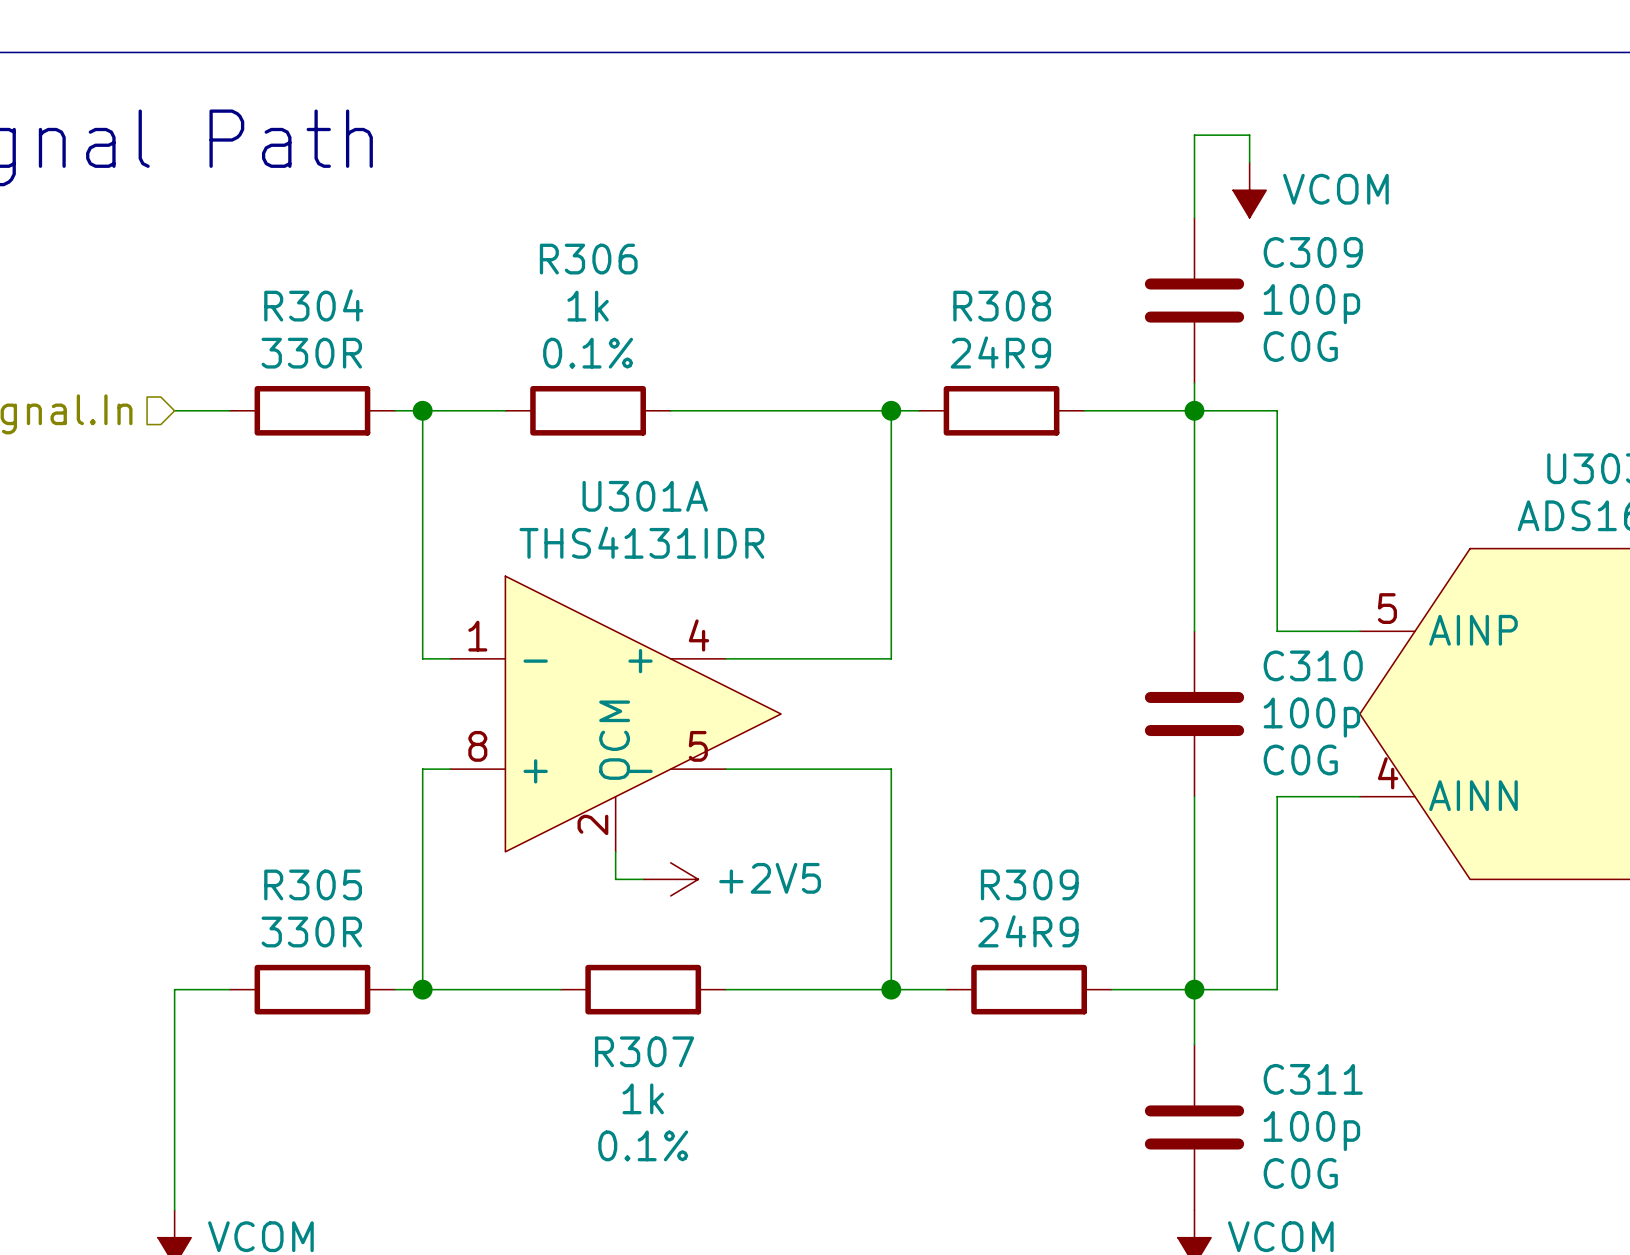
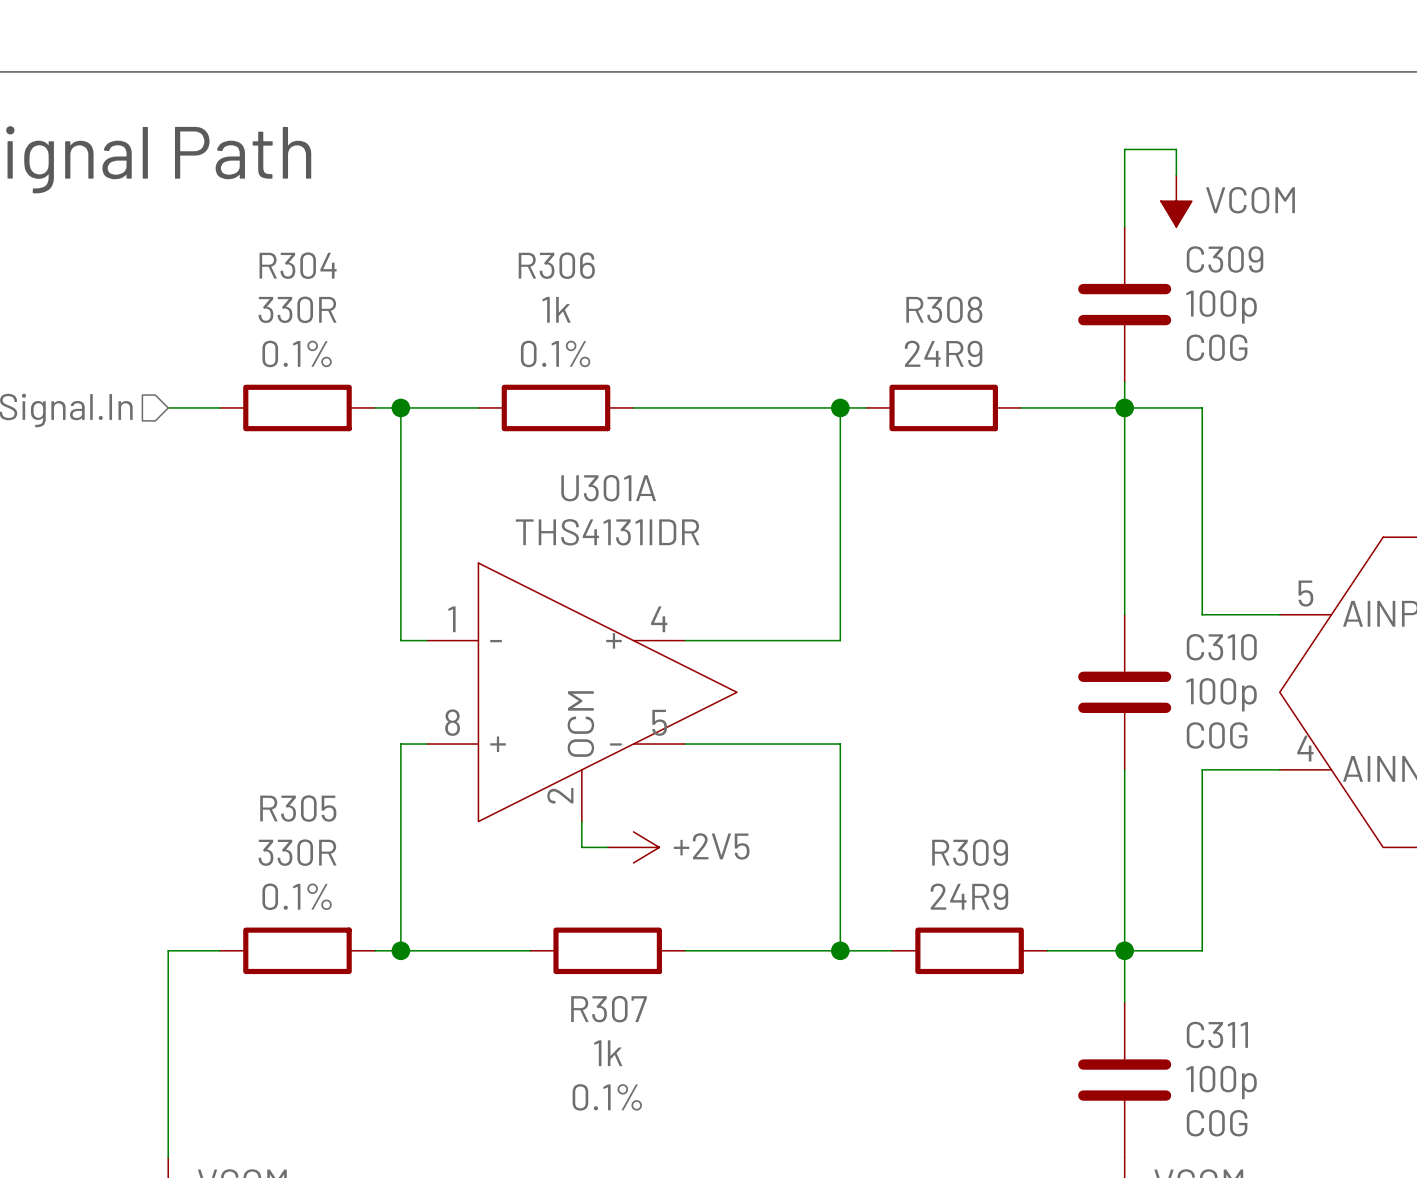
R304 name position: R304 (313, 305) -> R304 (298, 265)
R304 value position: 330R (311, 353) -> 330R (297, 309)
R304 text: none -> 0.1% (297, 353)
R305 name position: R305 (313, 884) -> R305 (298, 808)
R305 value position: 330R (311, 932) -> 330R (297, 852)
R305 text: none -> 0.1% (297, 896)

